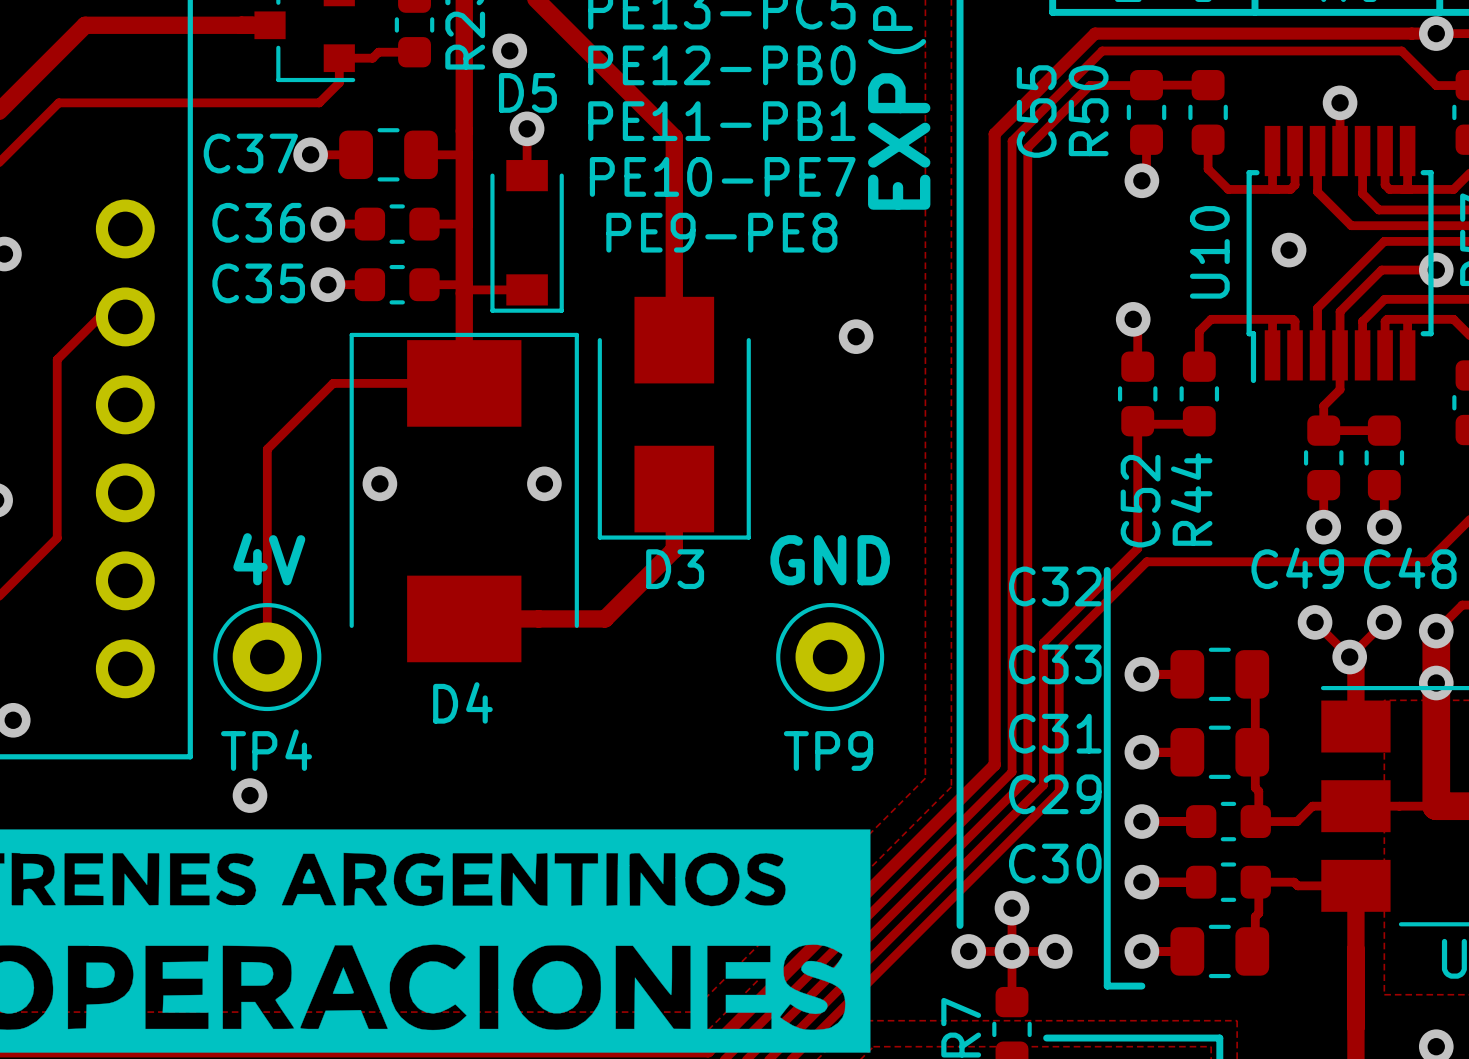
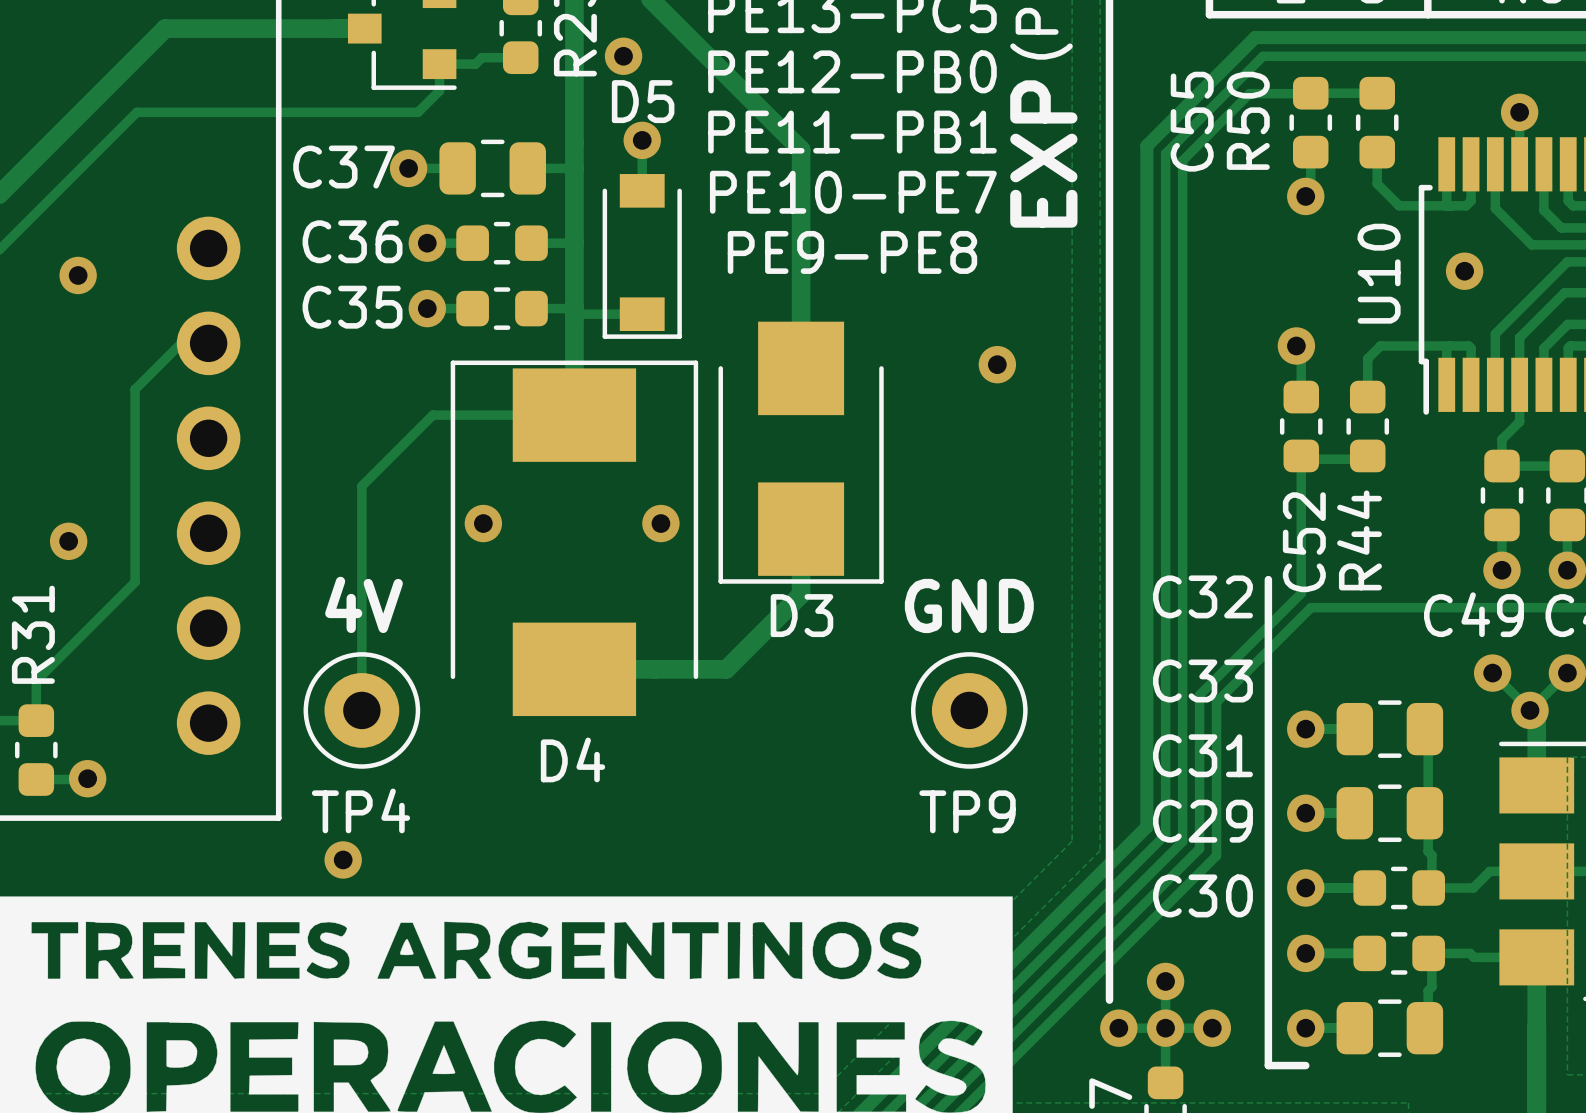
line: none -> (1268, 579) (1268, 616)
C32 name position: C32 (1055, 586) -> C32 (1202, 596)
C33 name position: C33 (1055, 664) -> C33 (1202, 681)
C31 name position: C31 (1055, 733) -> C31 (1202, 755)
C29 name position: C29 (1055, 794) -> C29 (1202, 821)
C30 name position: C30 (1055, 863) -> C30 (1202, 895)

